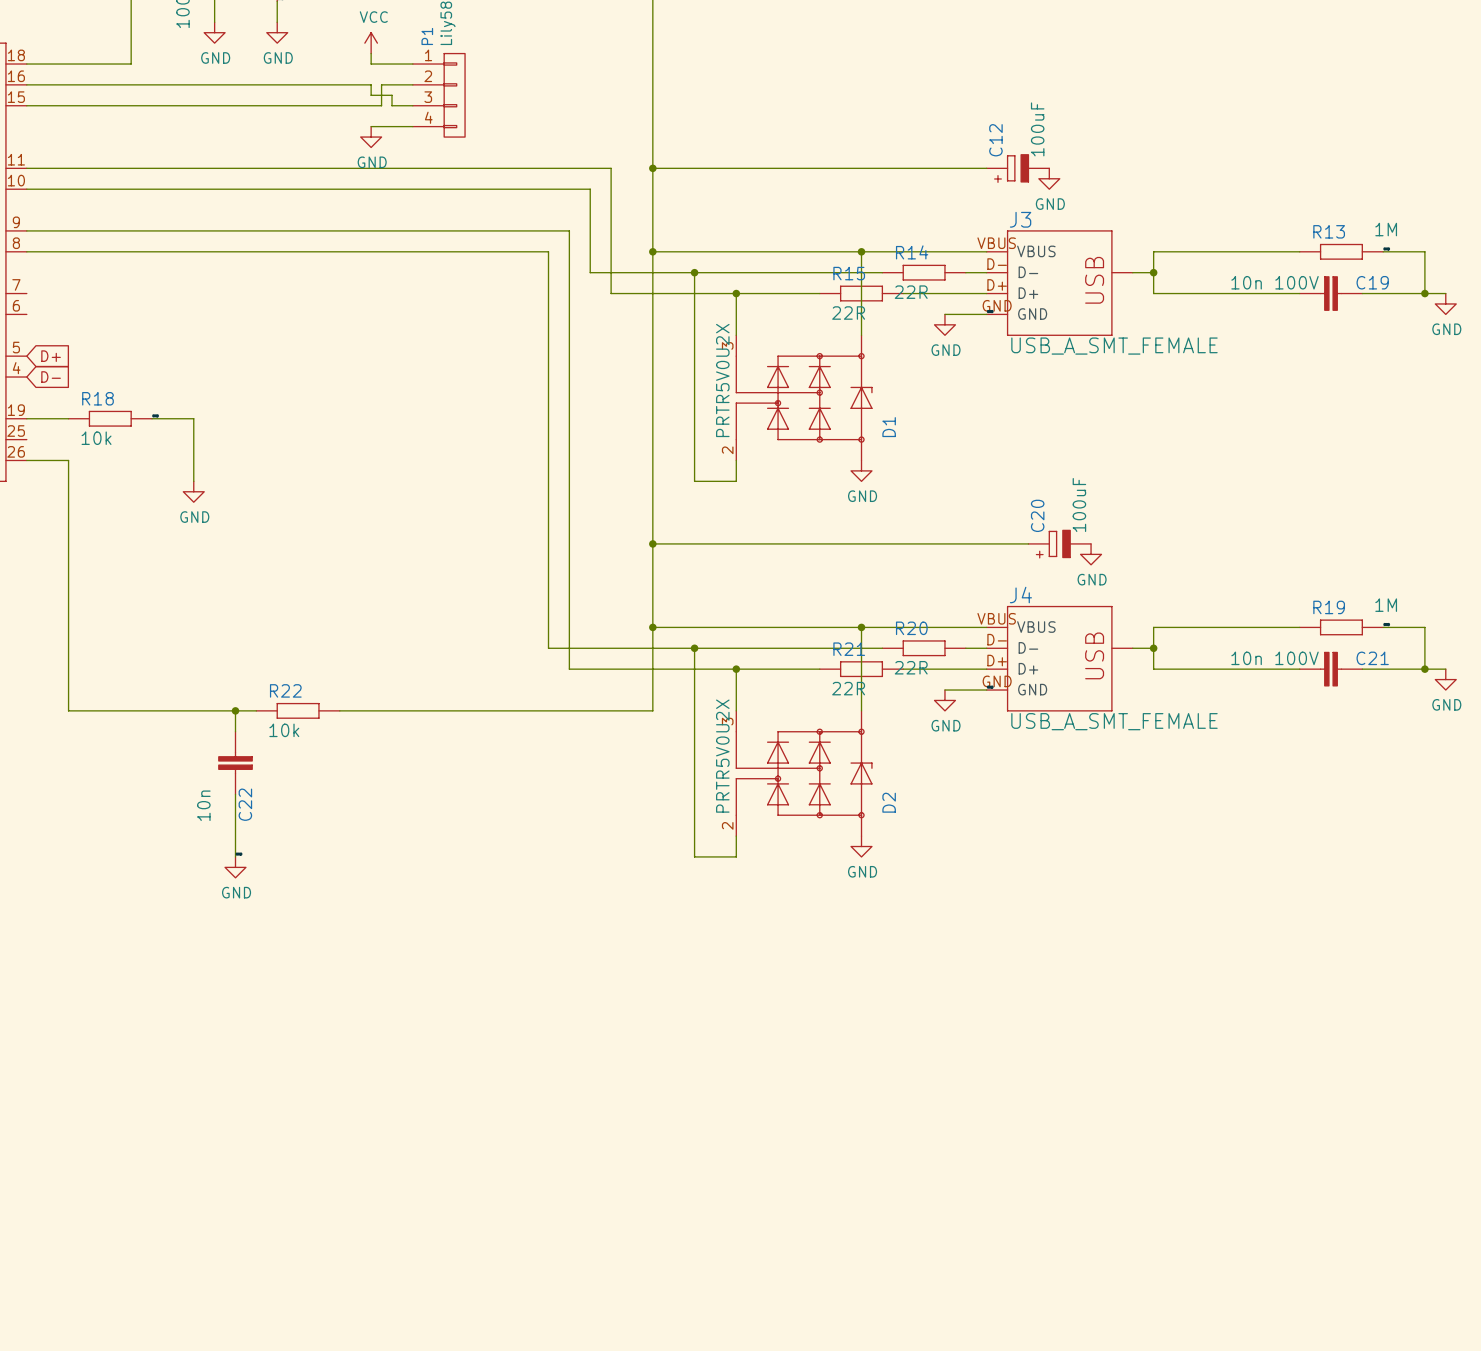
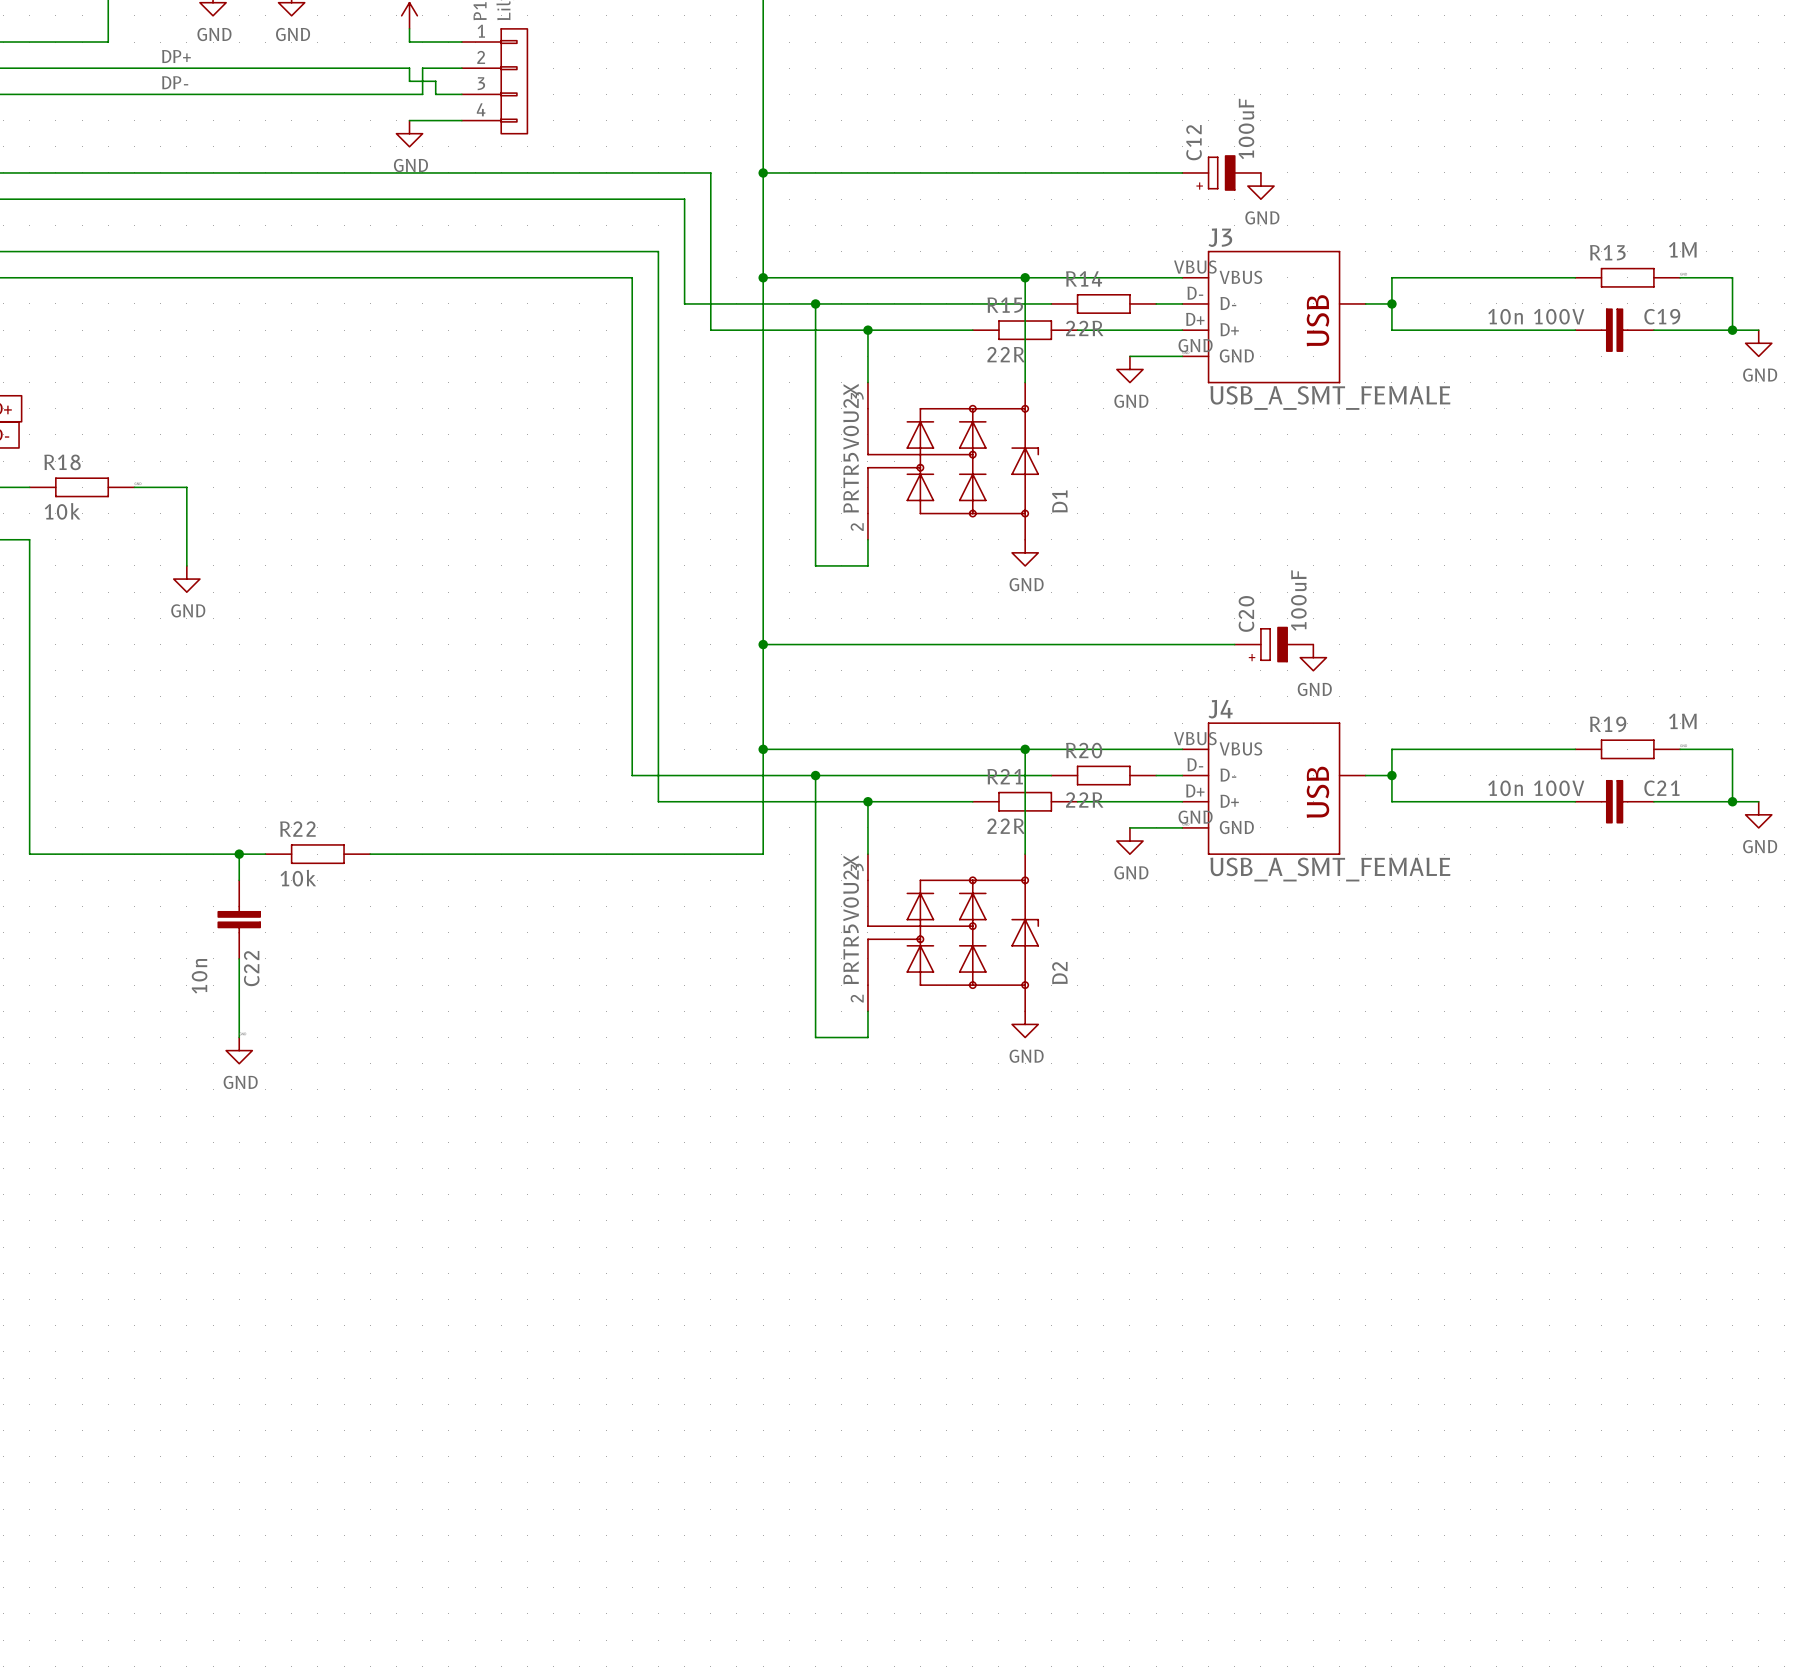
label: none -> DP+ (176, 56)
label: none -> DP- (175, 82)

